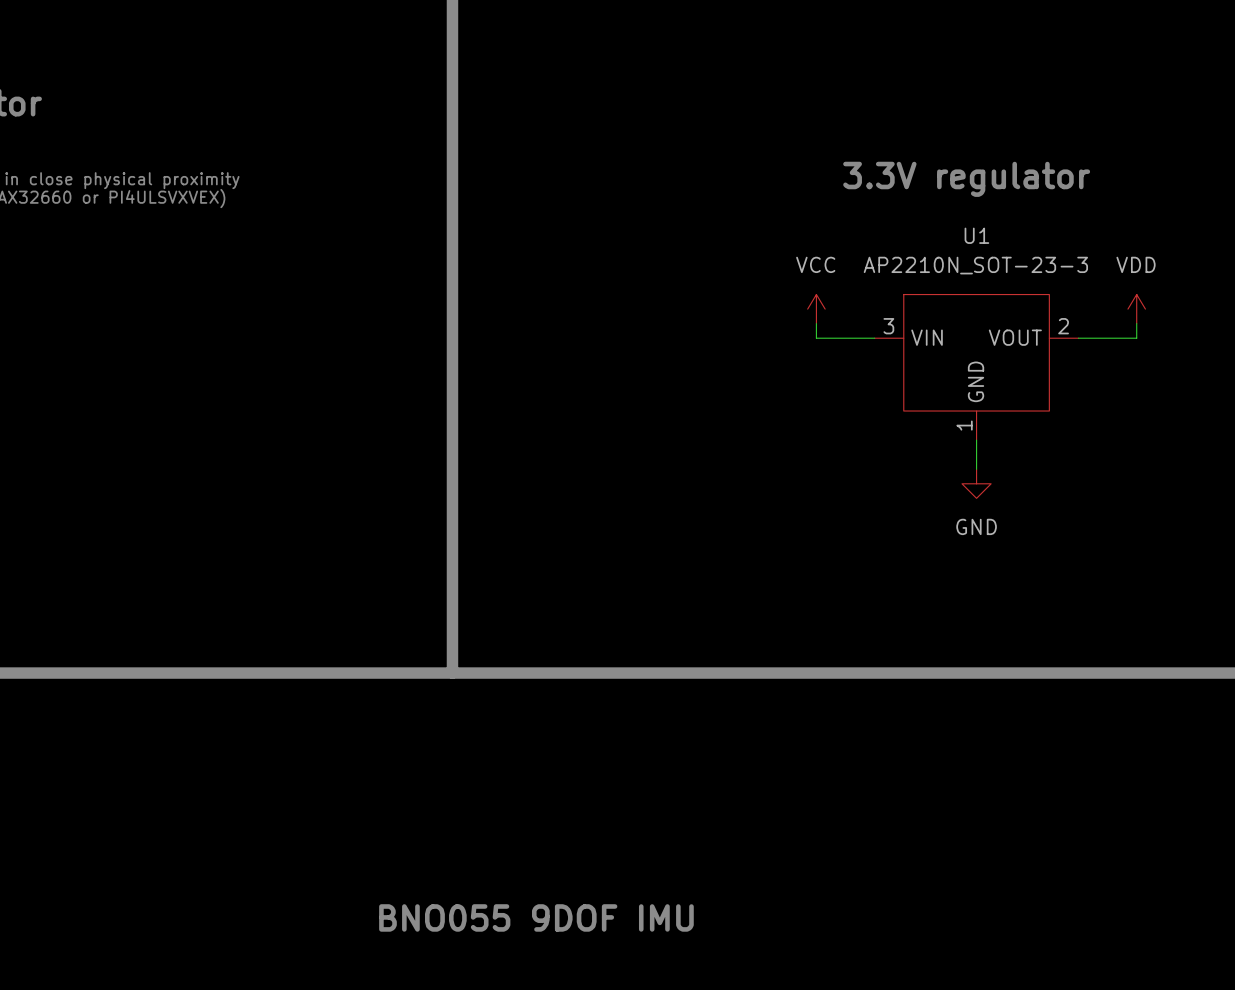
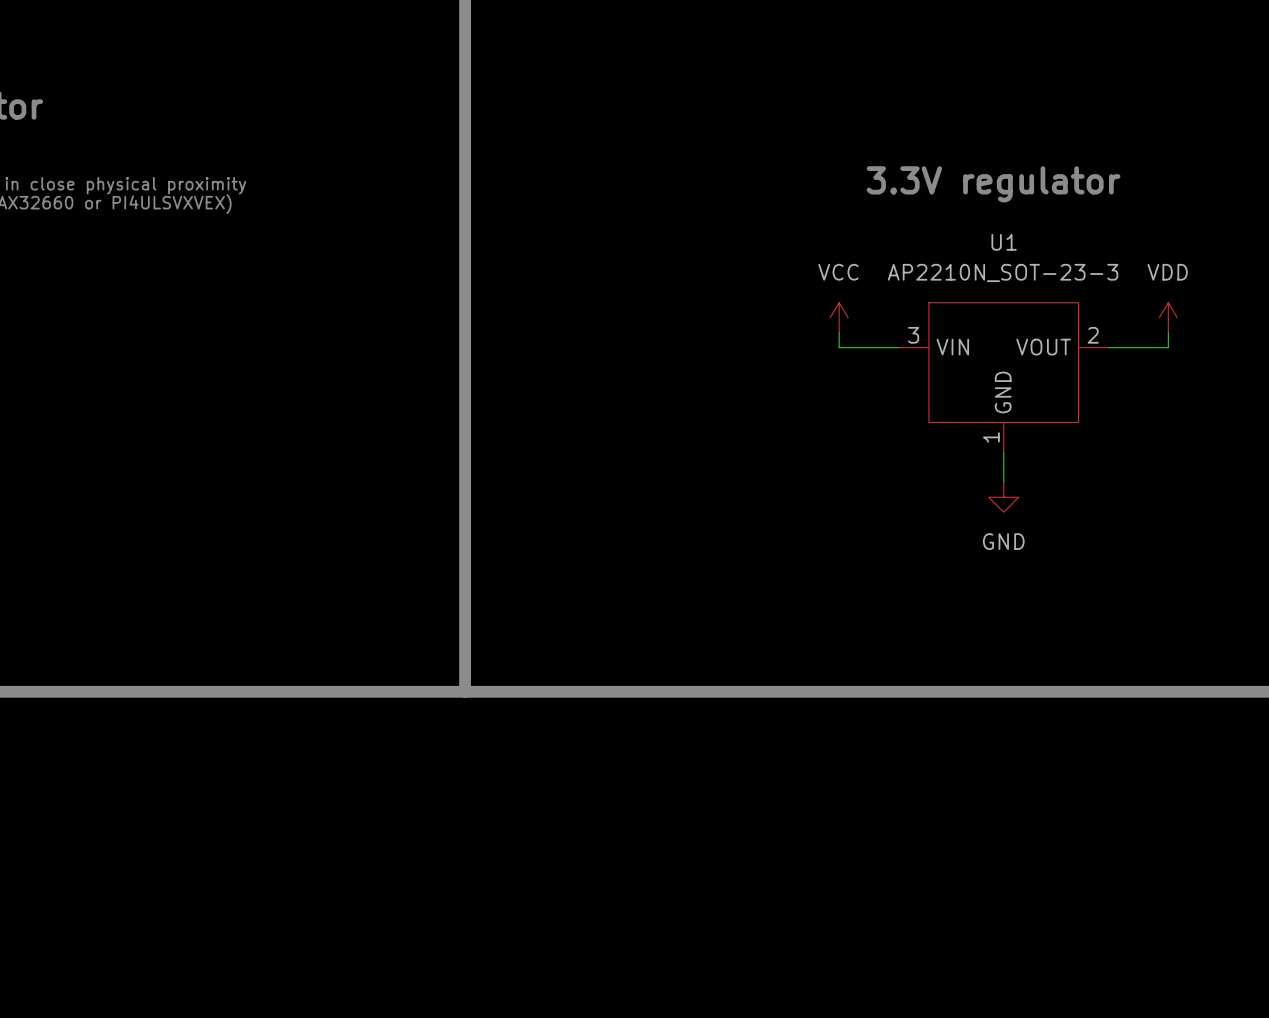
text: BNO055 9DOF IMU (536, 917) -> none

